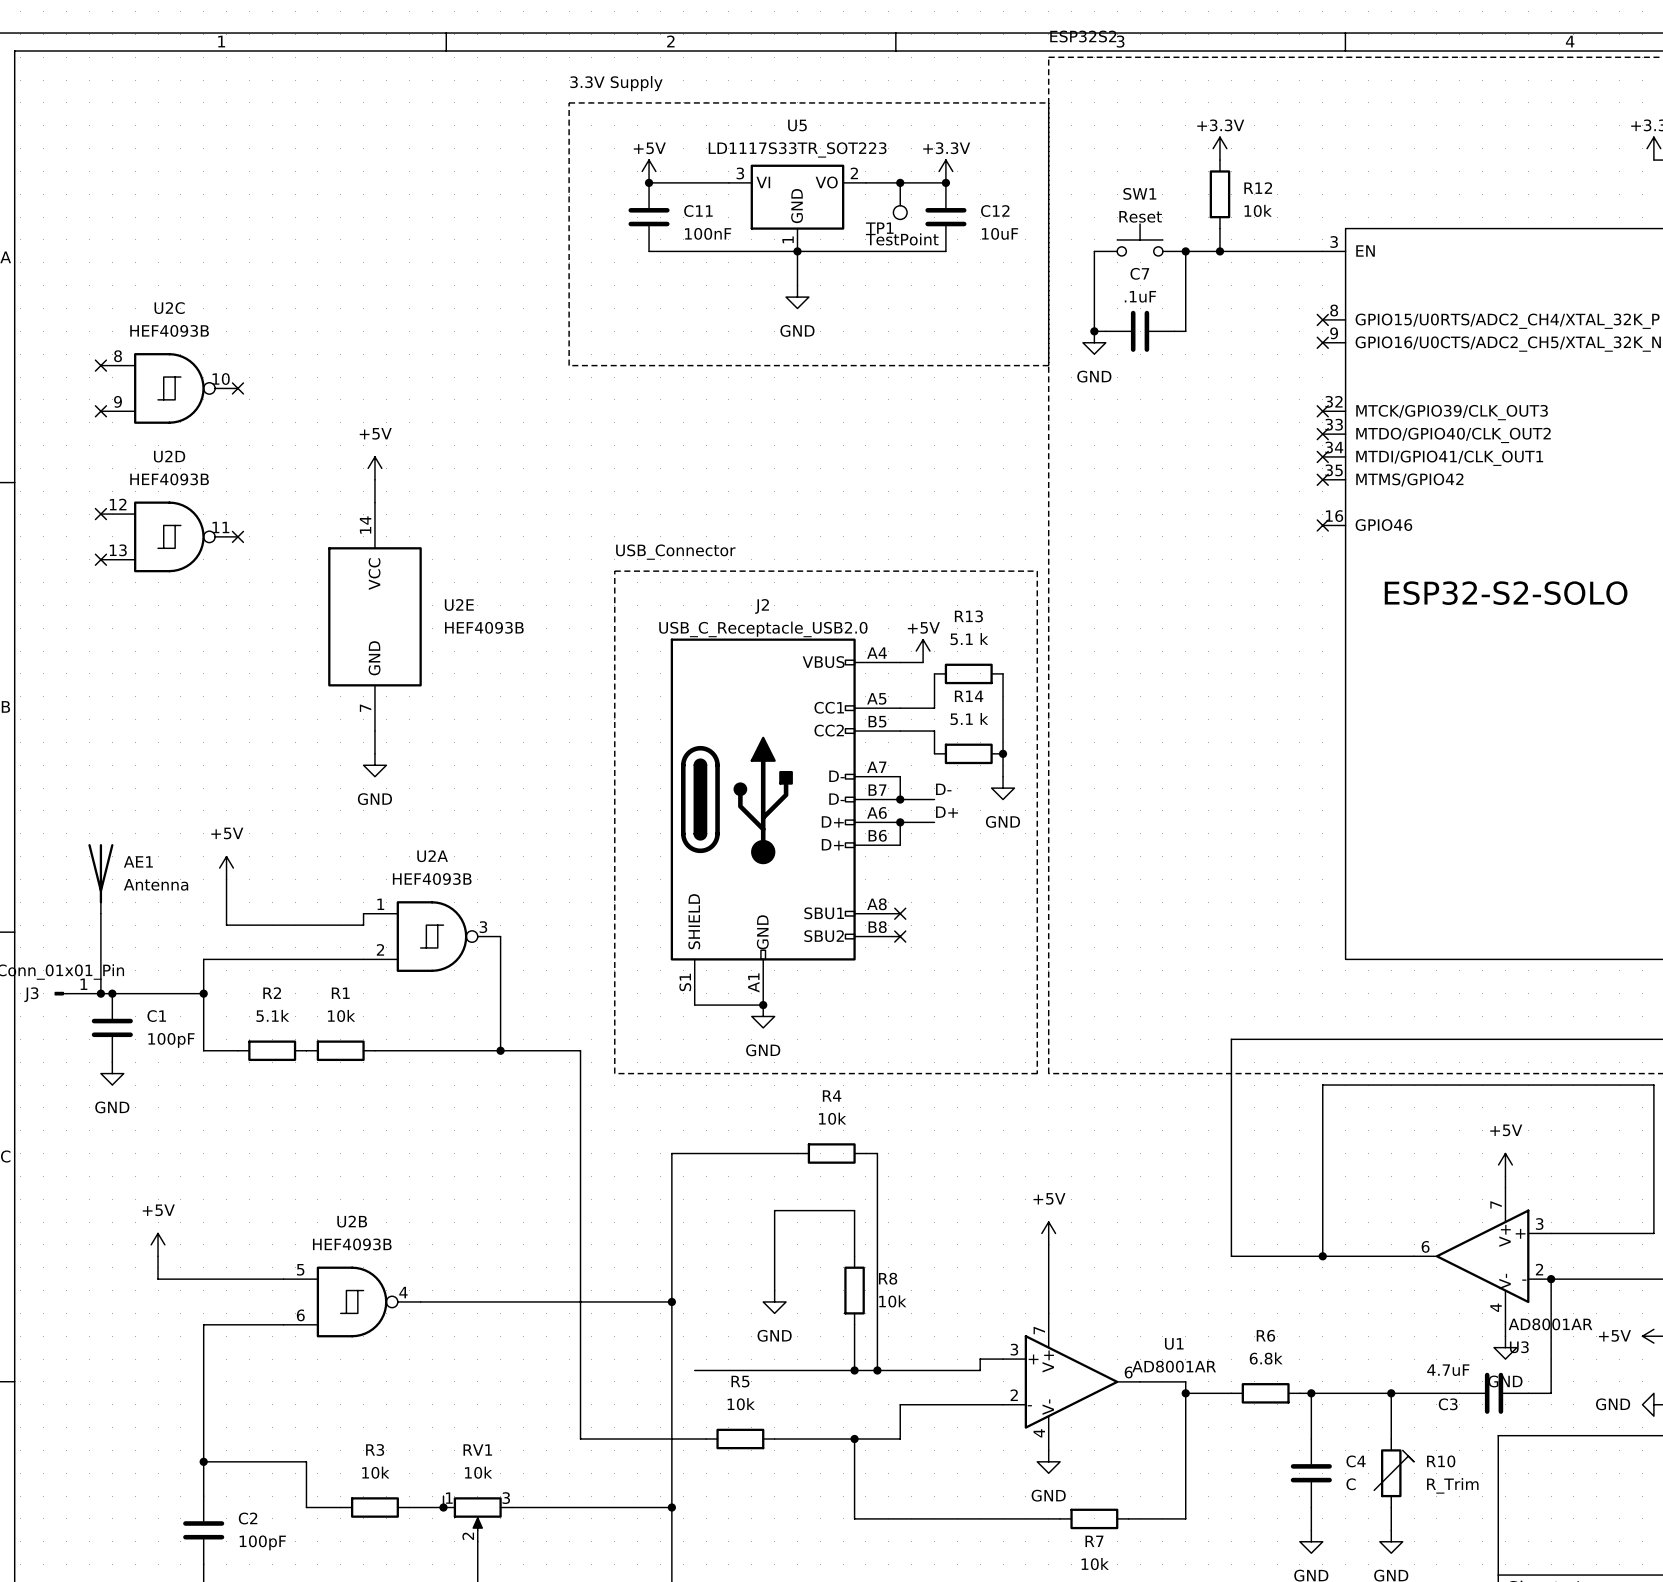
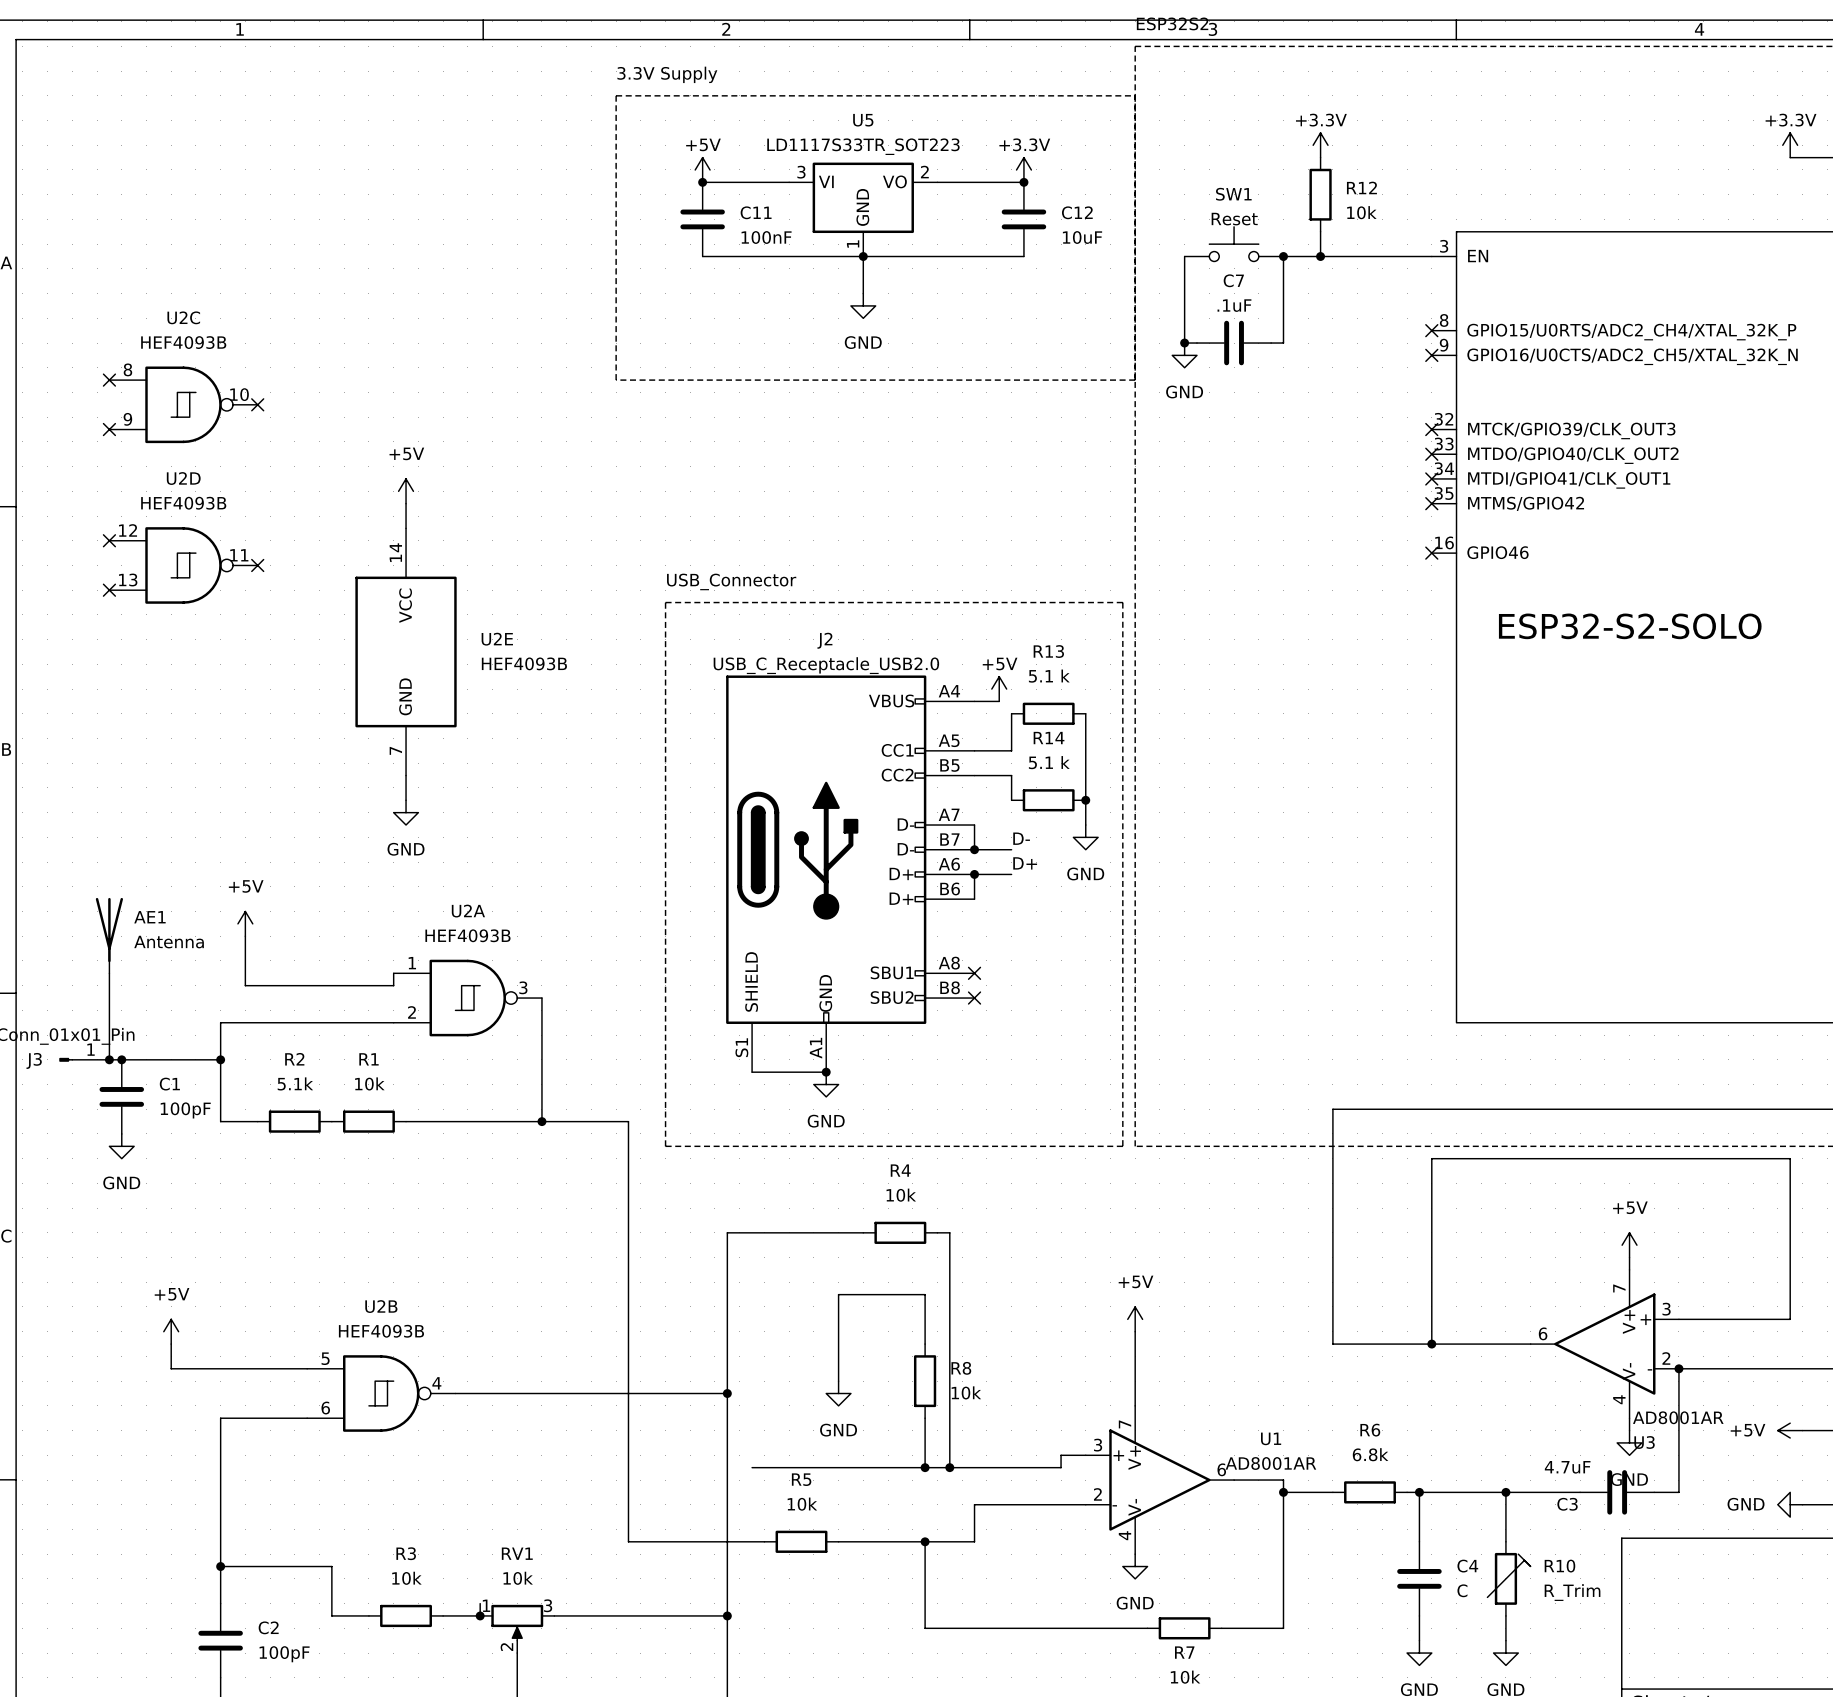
junction: (900, 182) -> none
TP1: TestPoint (900, 201) -> none

